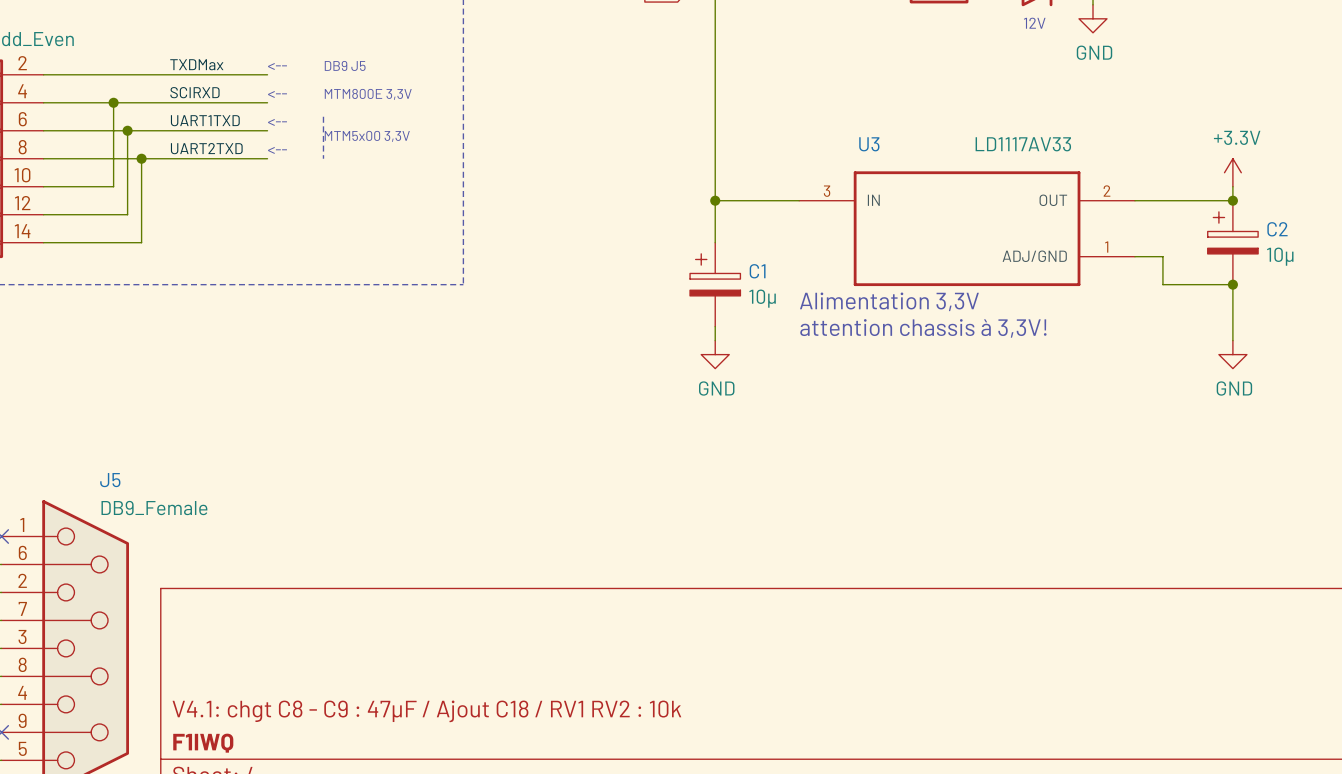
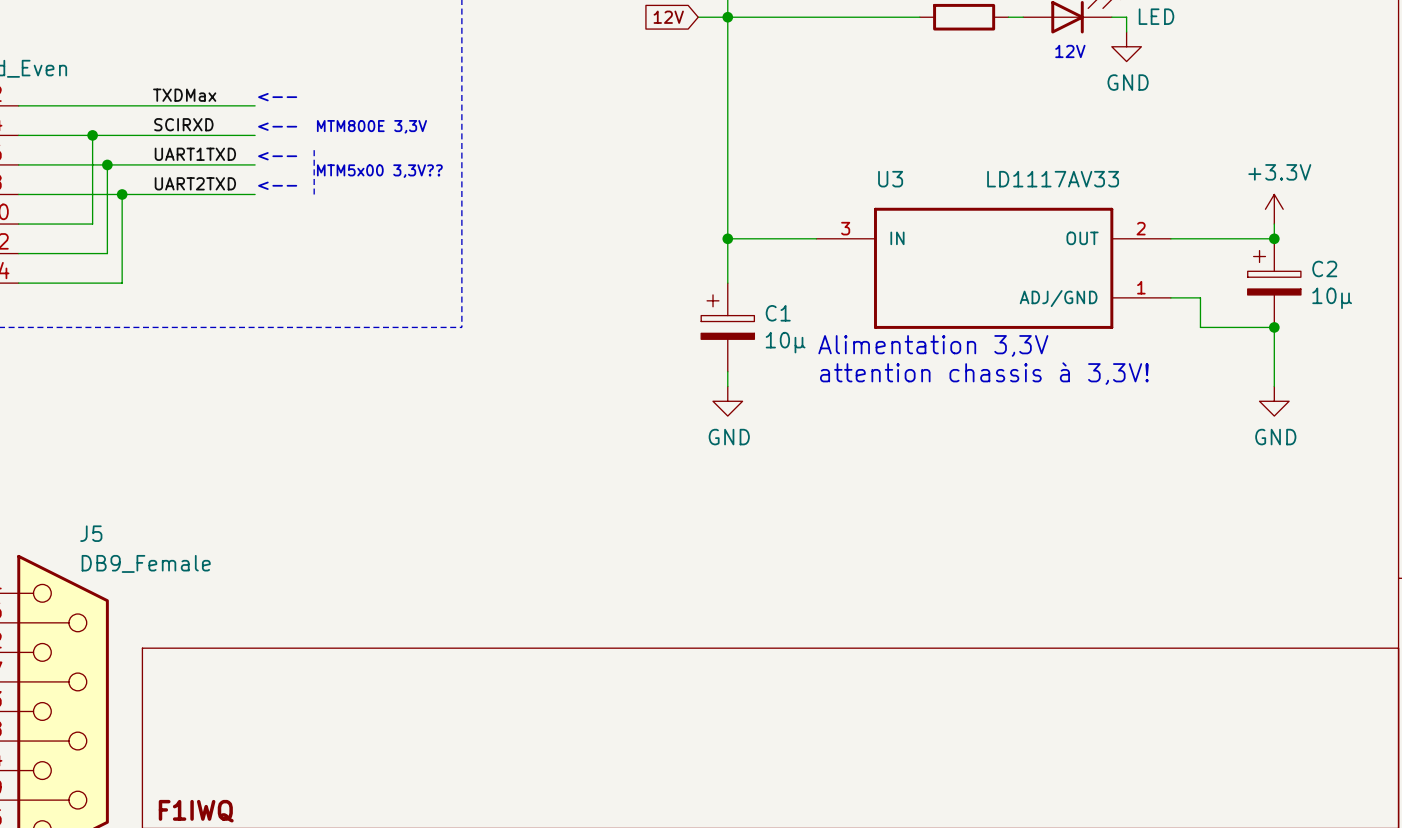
text: DB9 J5 (345, 65) -> none
text: MTM5x00 3,3V (367, 136) -> MTM5x00 3,3V?? (379, 171)
title block: V4.1: chgt C8 - C9 : 47µF / Ajout C18 / RV1 RV2 : 10k (426, 711) -> none

